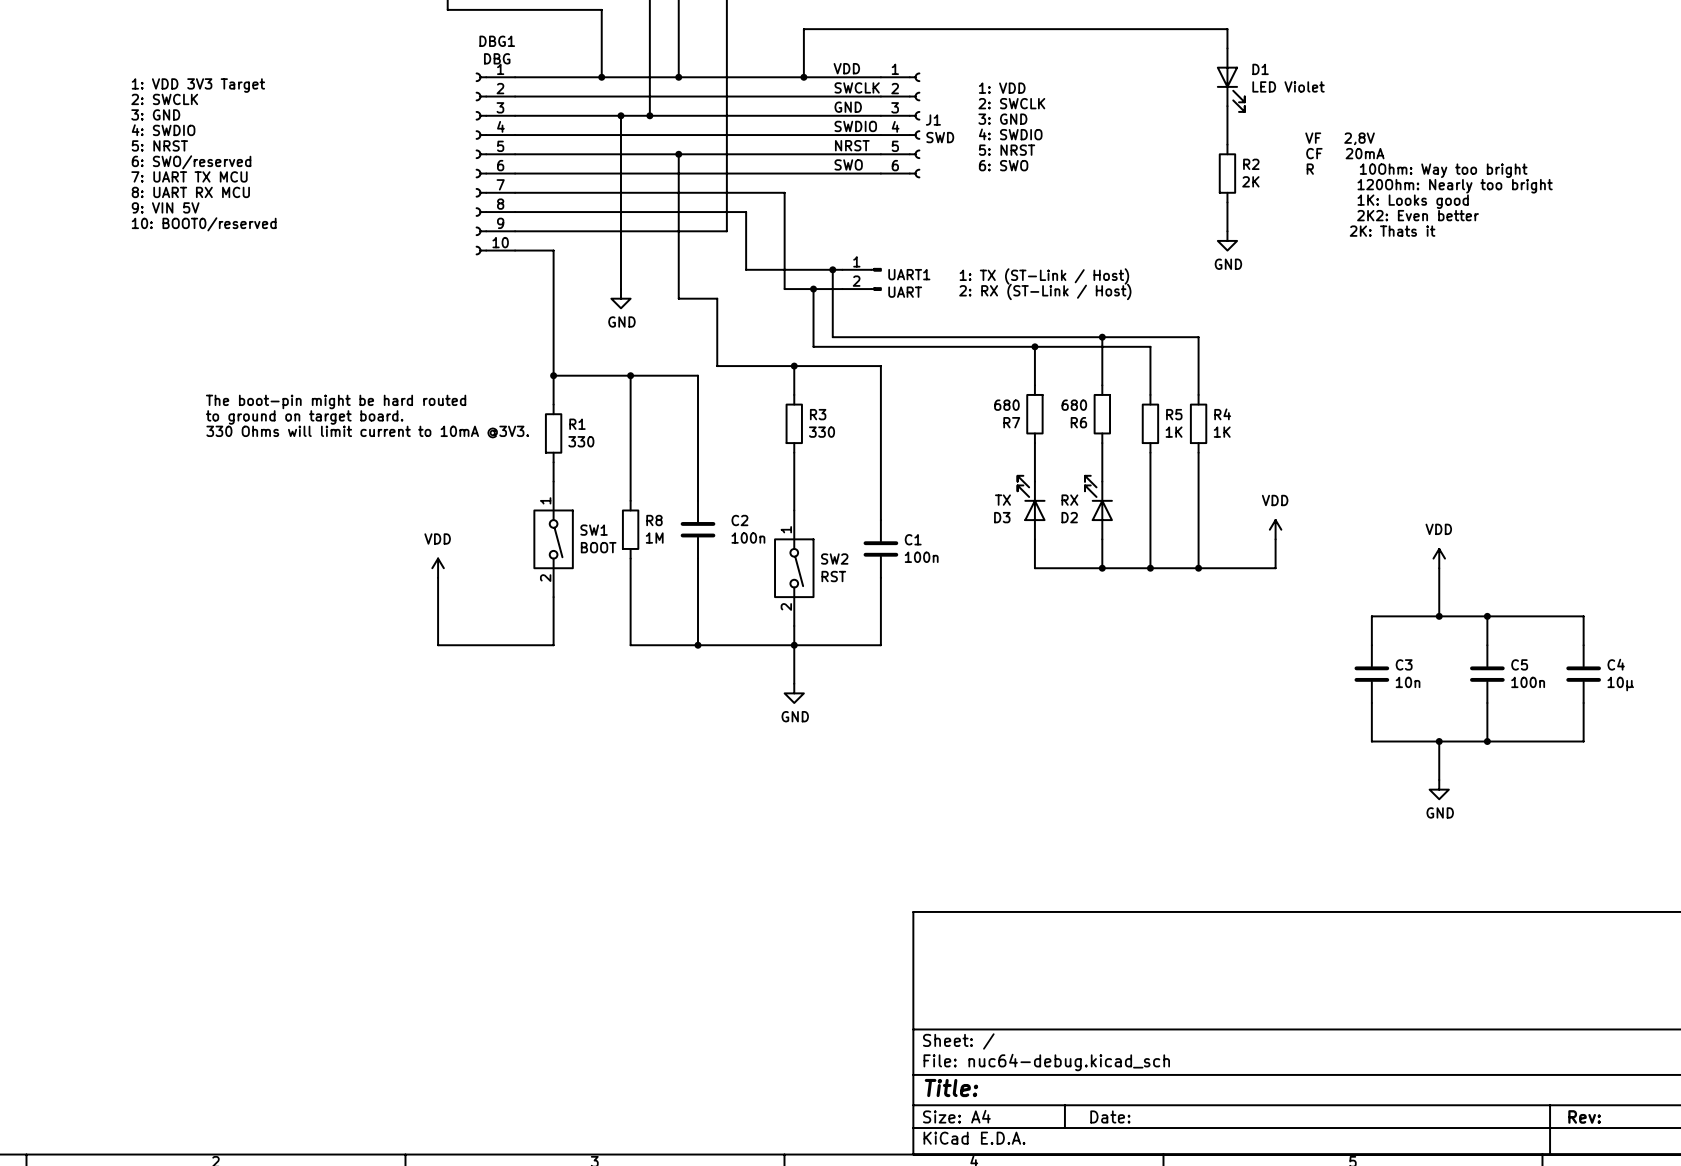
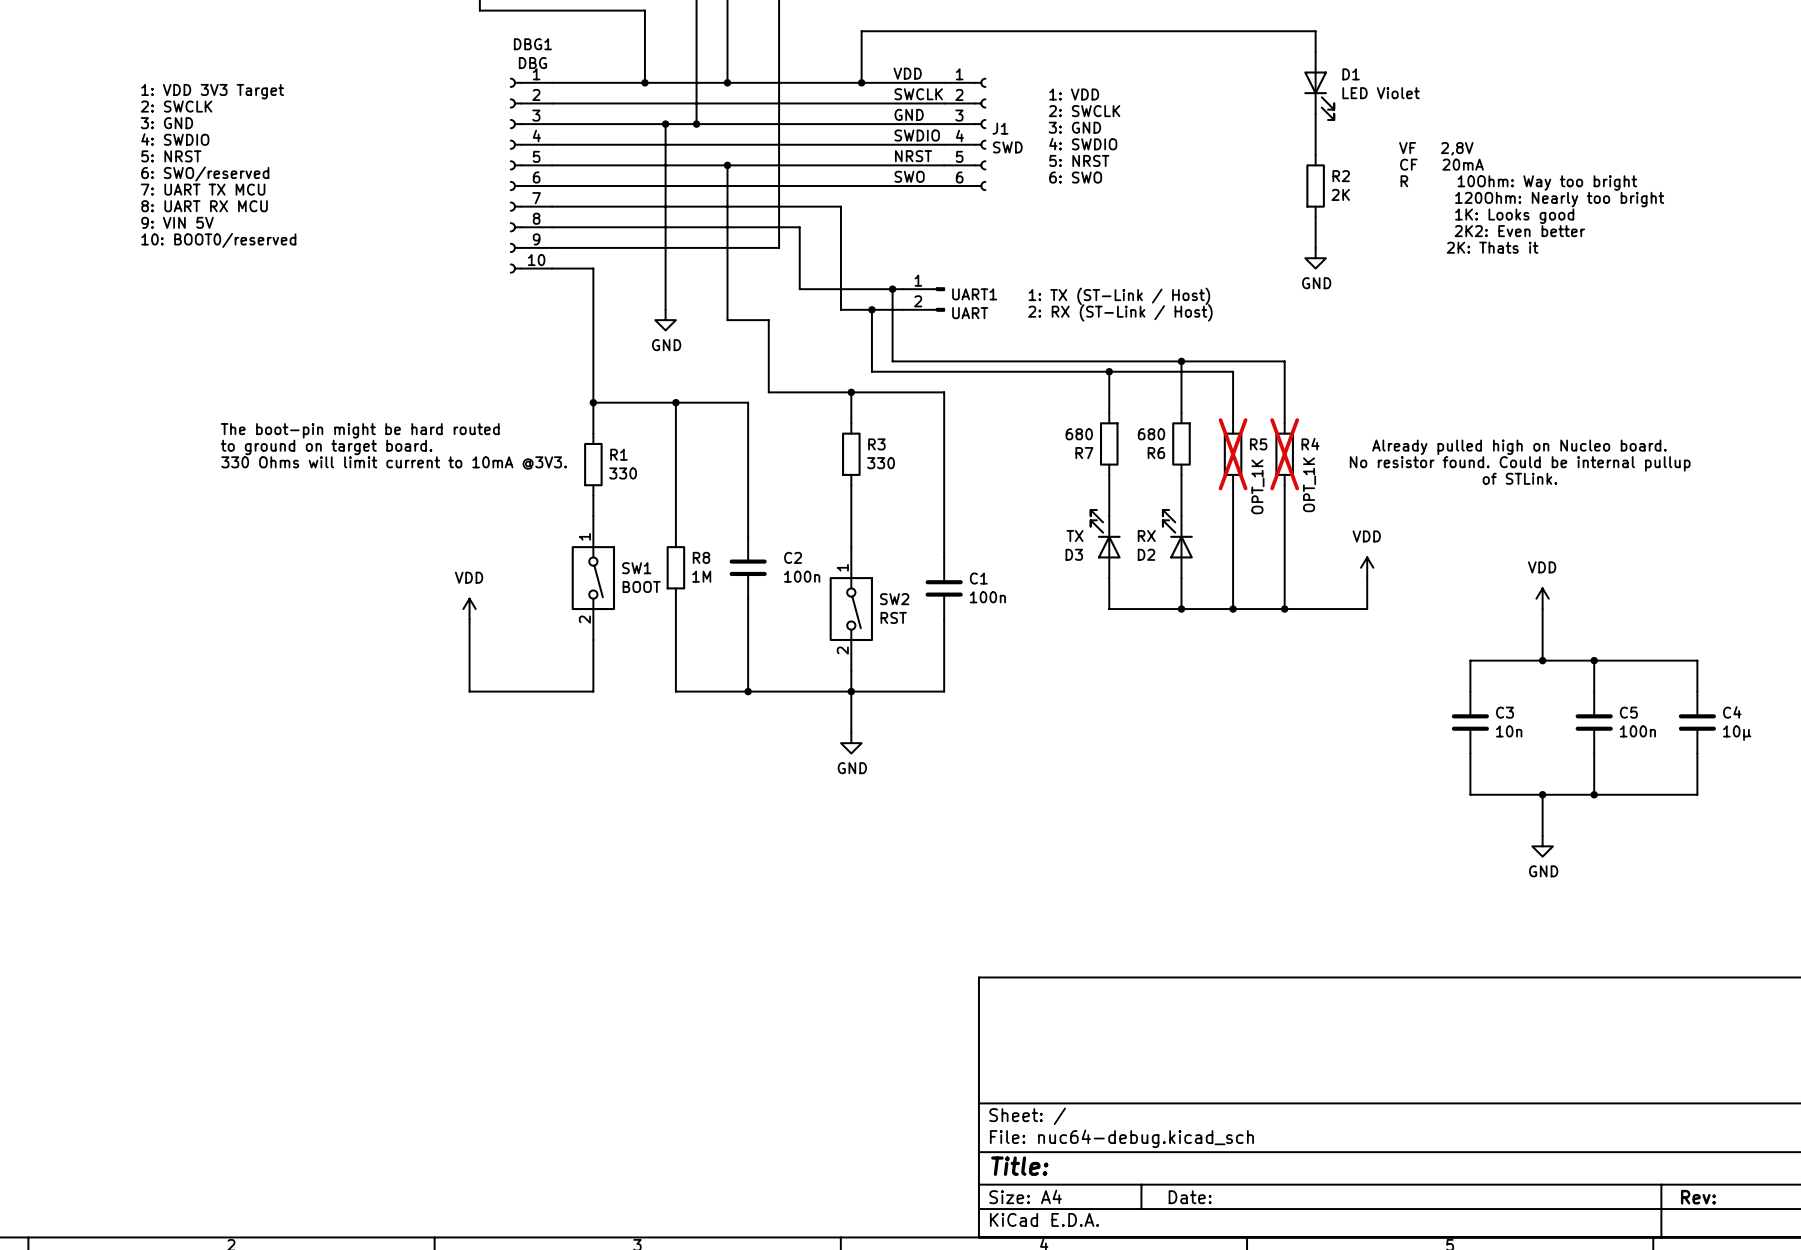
text: none -> Already pulled high on Nucleo board. (1519, 447)
R5 do-not-place cross: none -> (1233, 454)
R4 do-not-place cross: none -> (1284, 454)
R5 value: 1K (1174, 432) -> OPT_1K (1257, 486)
R4 value: 1K (1222, 432) -> OPT_1K (1309, 484)
text: none -> No resistor found. Could be internal pullup (1520, 463)
text: none -> of STLink. (1519, 478)

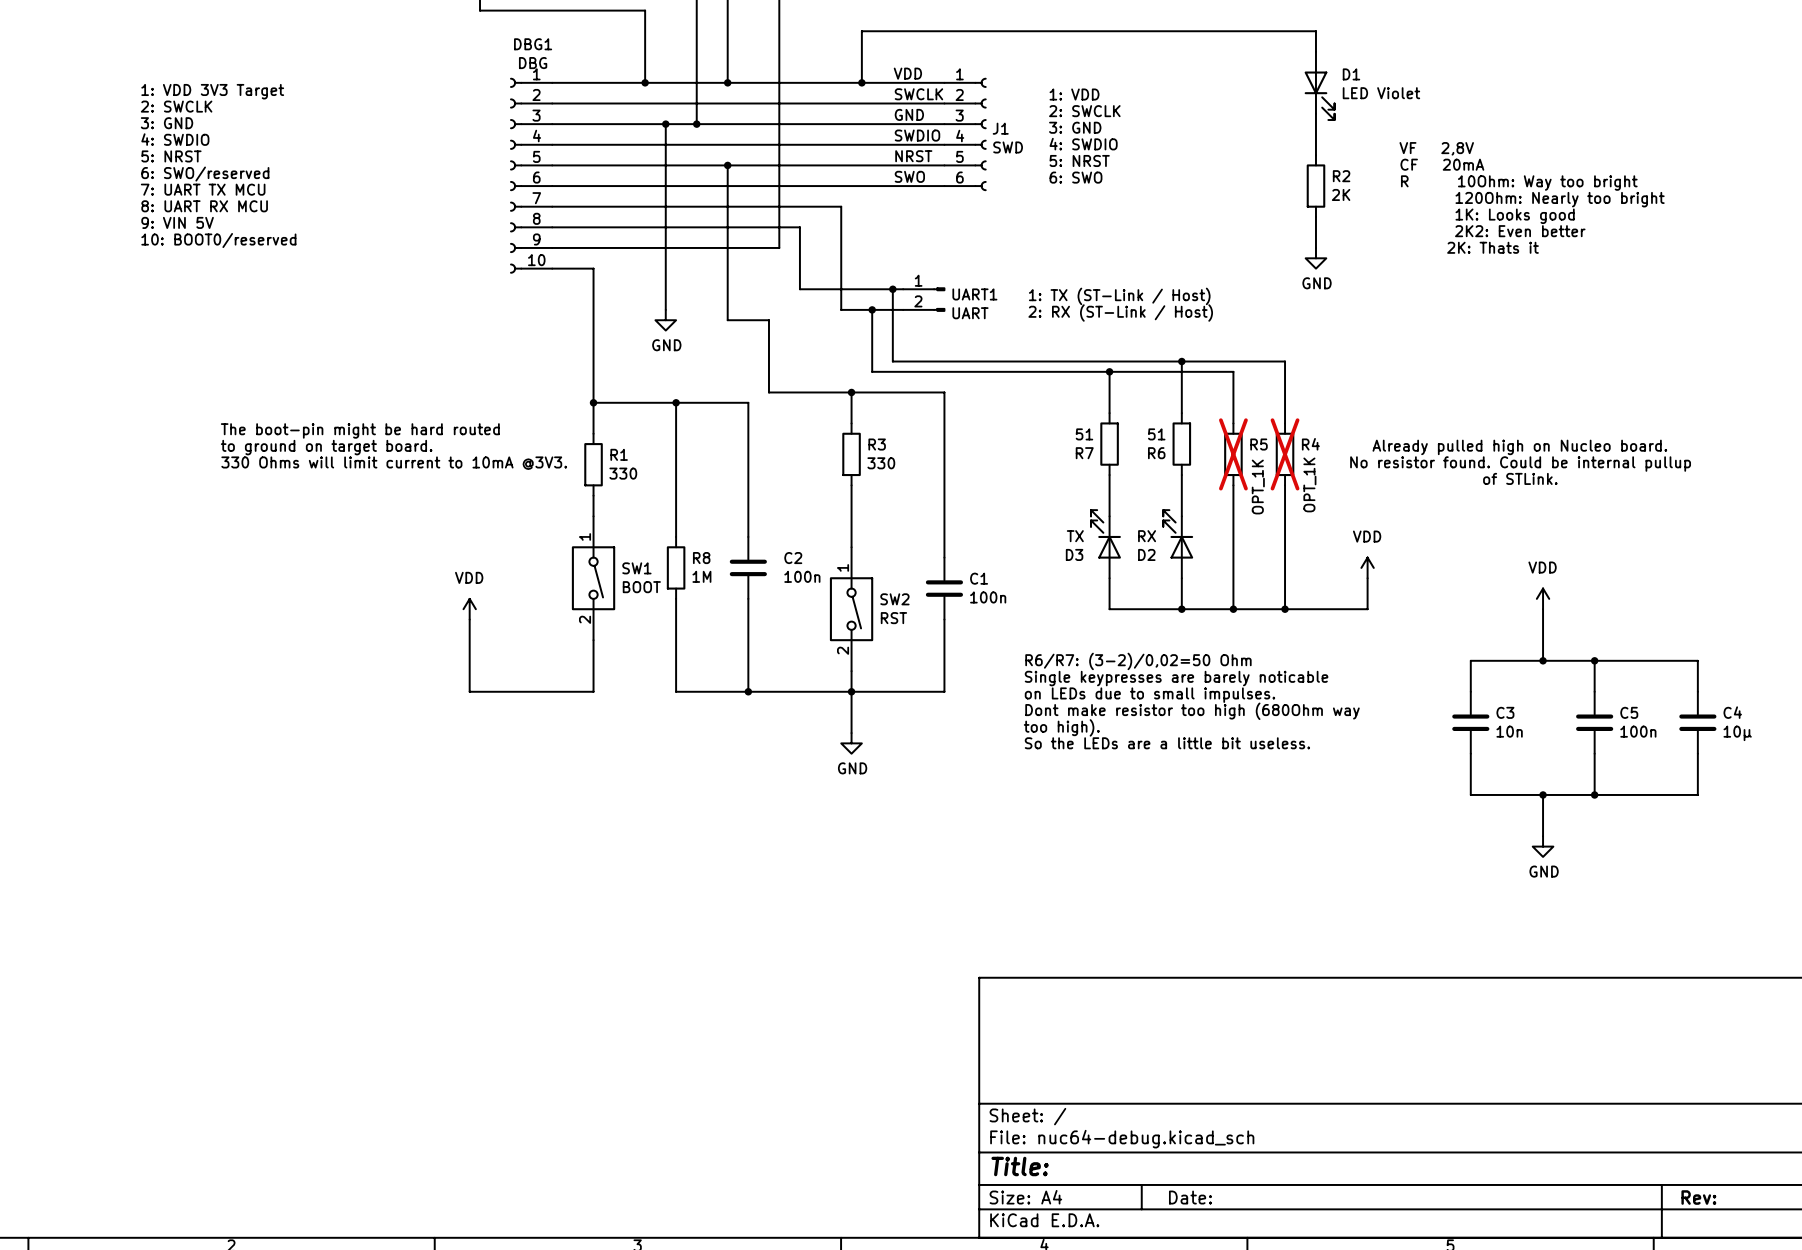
R7 value: 680 (1079, 434) -> 51 (1084, 434)
R6 value: 680 (1151, 434) -> 51 (1156, 434)
text: none -> R6/R7: (3-2)/0,02=50 Ohm (1138, 661)
text: none -> Single keypresses are barely noticable (1176, 678)
text: none -> on LEDs due to small impulses. (1150, 695)
text: none -> Dont make resistor too high (680Ohm way (1192, 711)
text: none -> too high). (1061, 727)
text: none -> So the LEDs are a little bit useless. (1167, 743)

